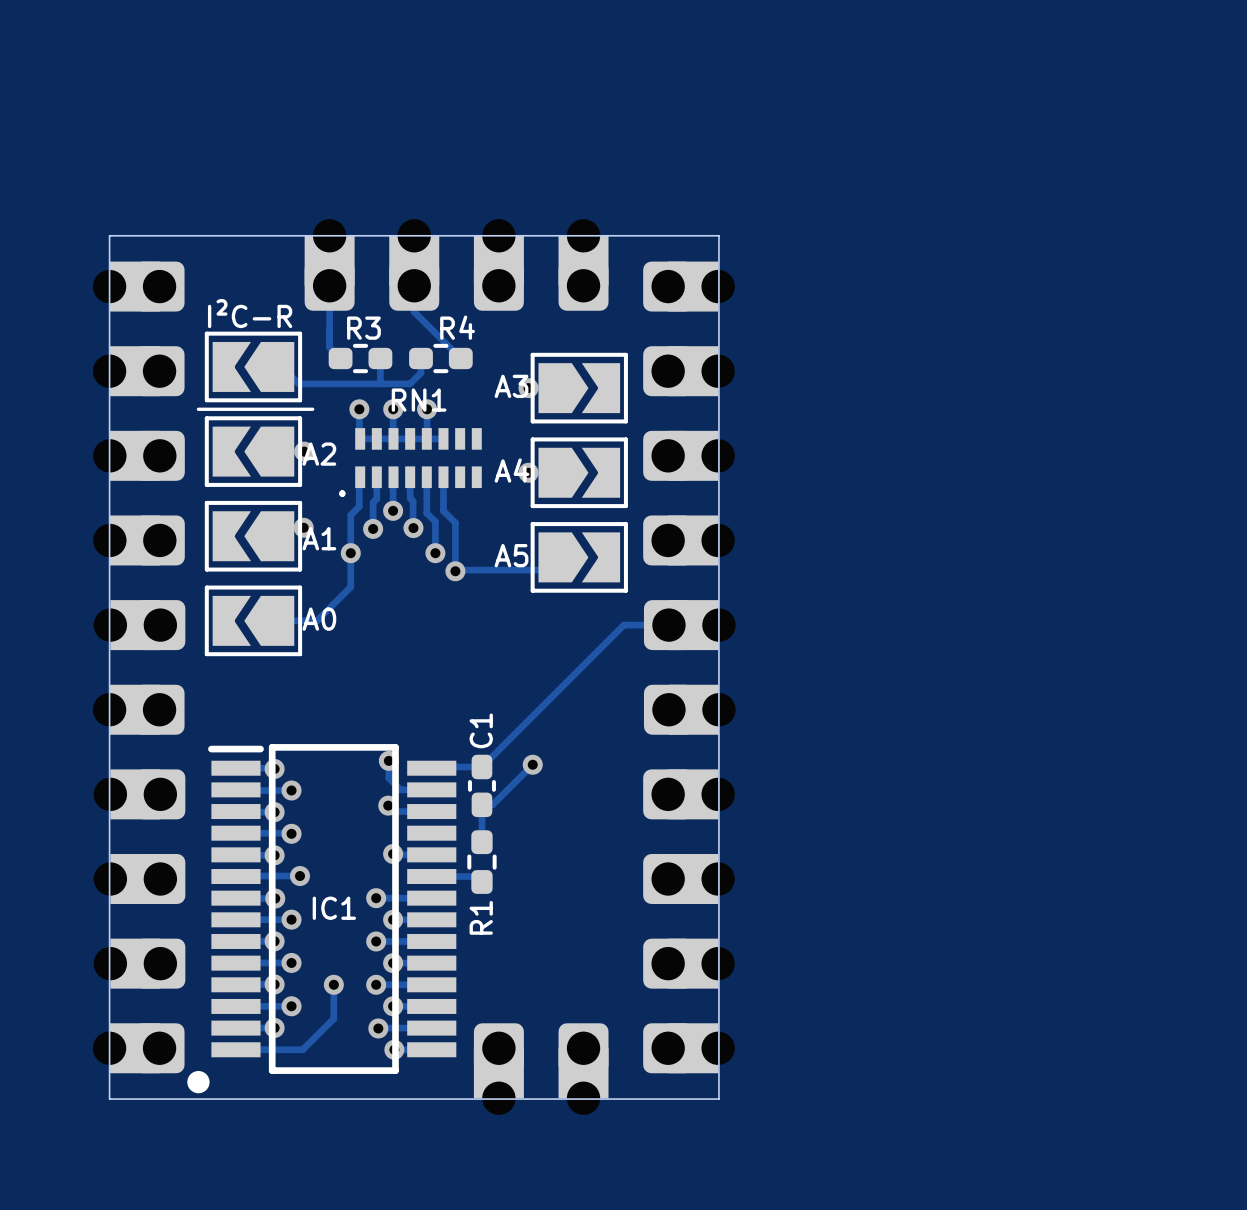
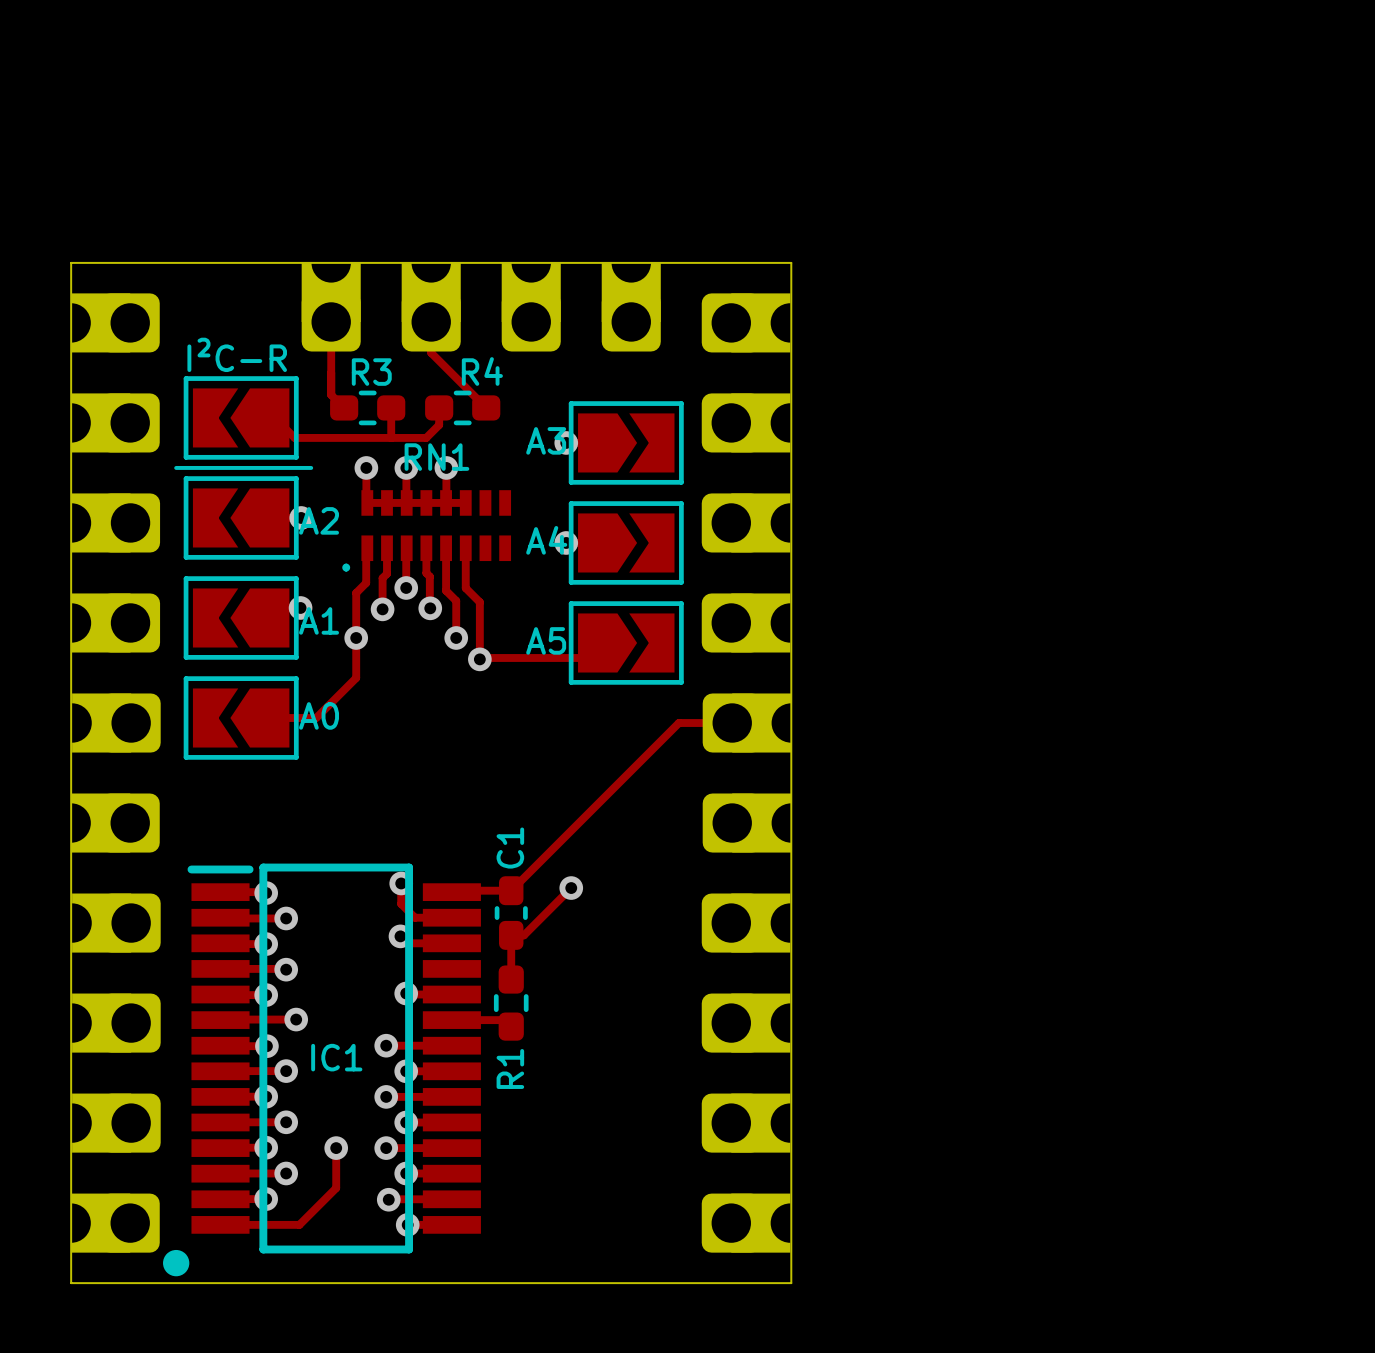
part: (498, 1069) -> none
part: (583, 1069) -> none

